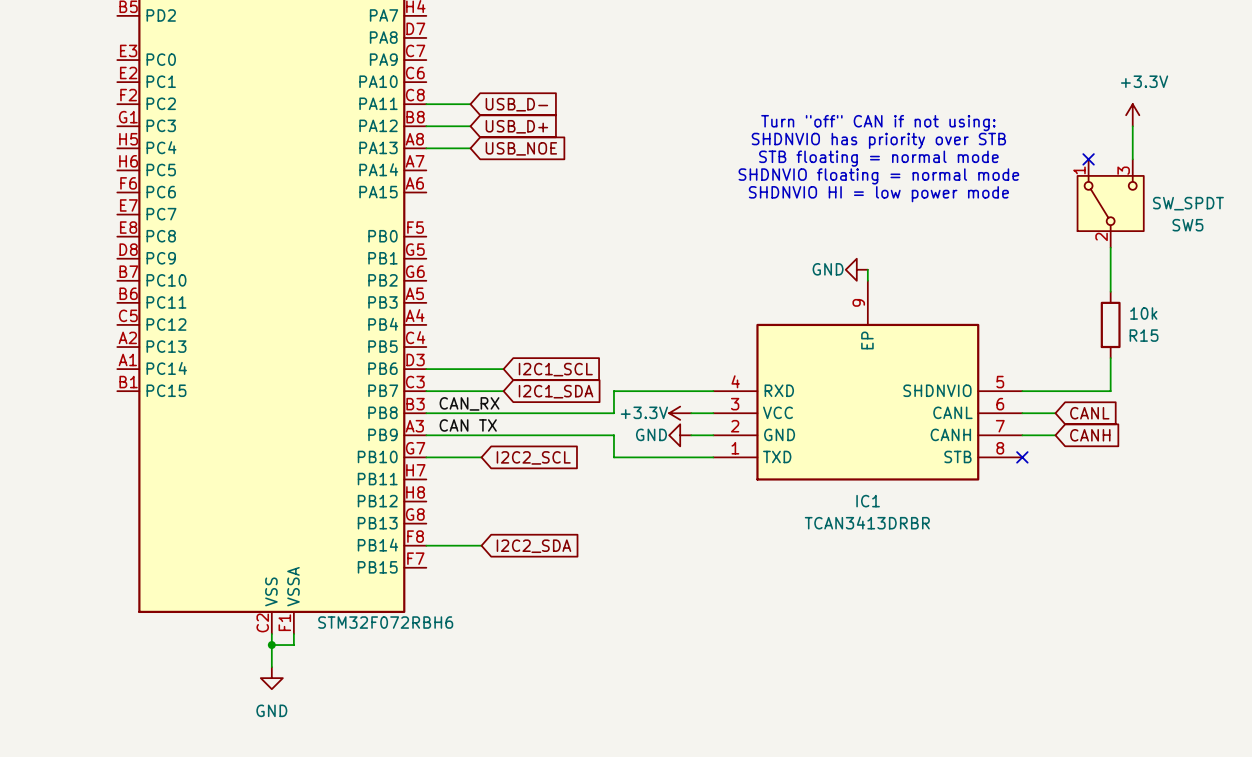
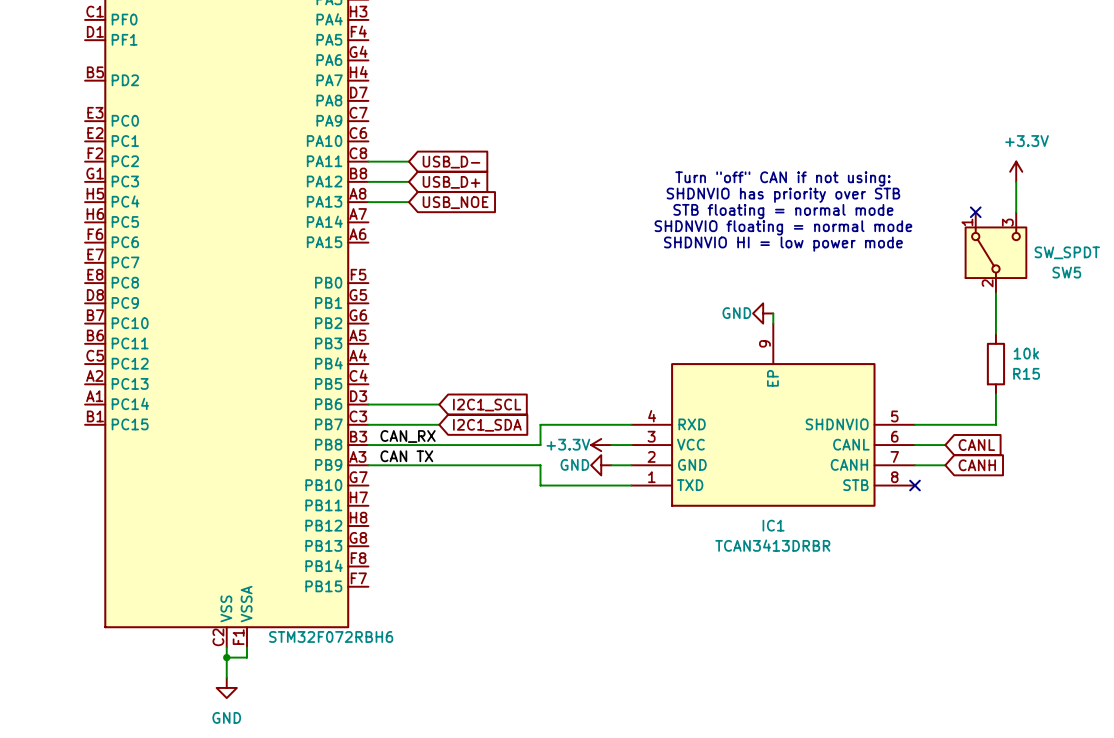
wire: (426, 457) (481, 457) -> none
global label: I2C2_SCL (533, 457) -> none
wire: (426, 545) (481, 545) -> none
global label: I2C2_SDA (533, 546) -> none

